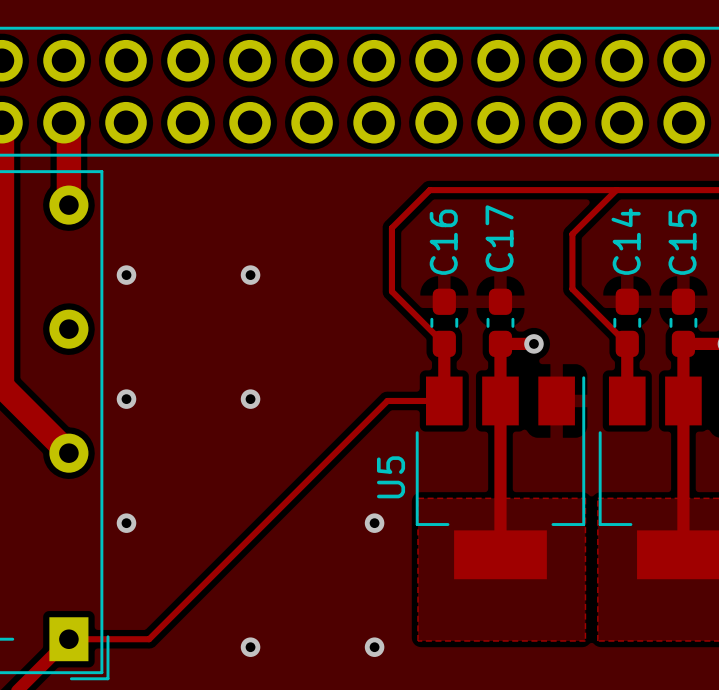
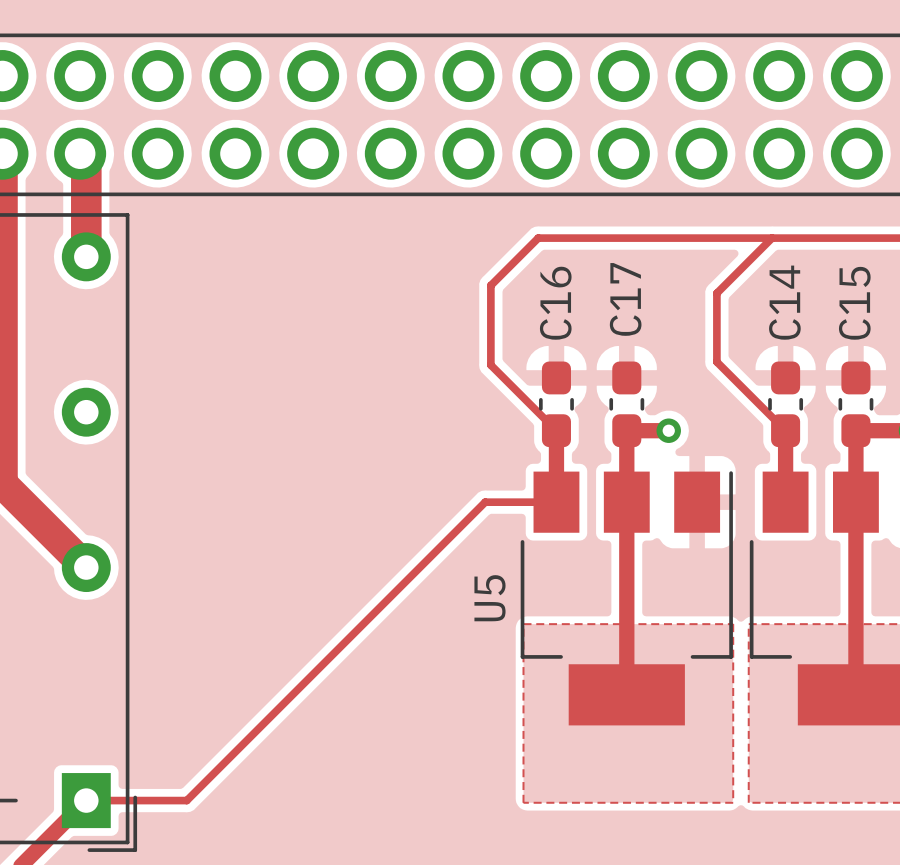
via: (126, 275) -> none
via: (250, 275) -> none
via: (126, 399) -> none
via: (250, 399) -> none
via: (126, 523) -> none
via: (374, 523) -> none
via: (250, 647) -> none
via: (374, 647) -> none

